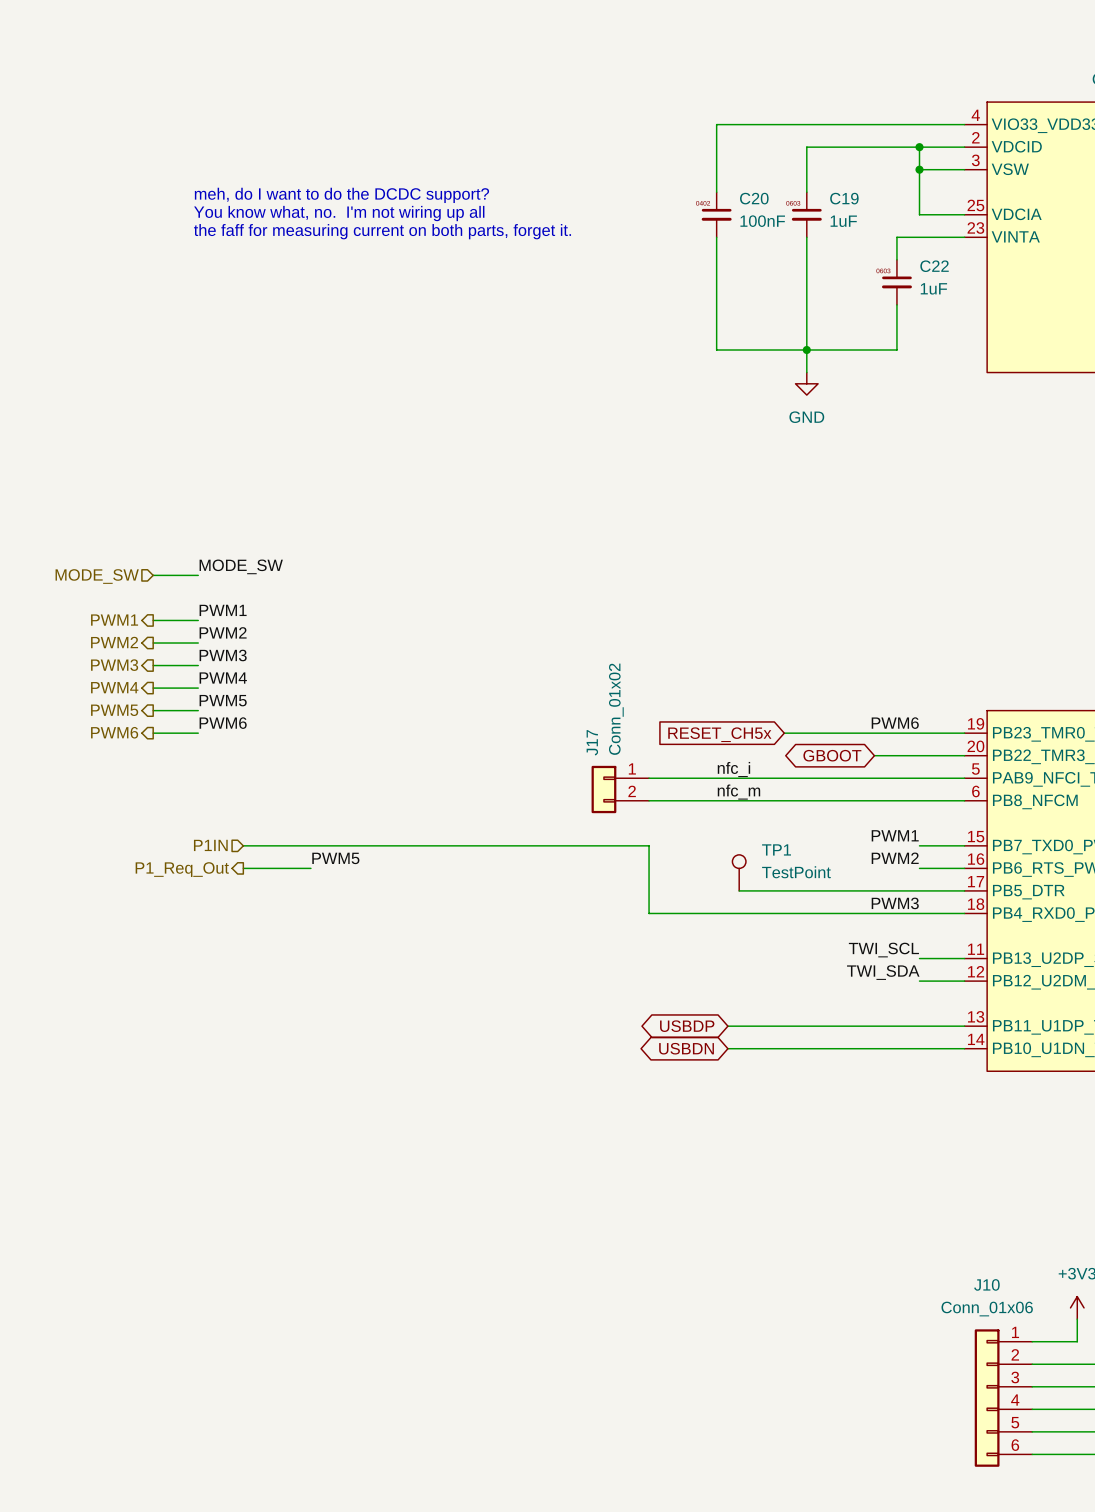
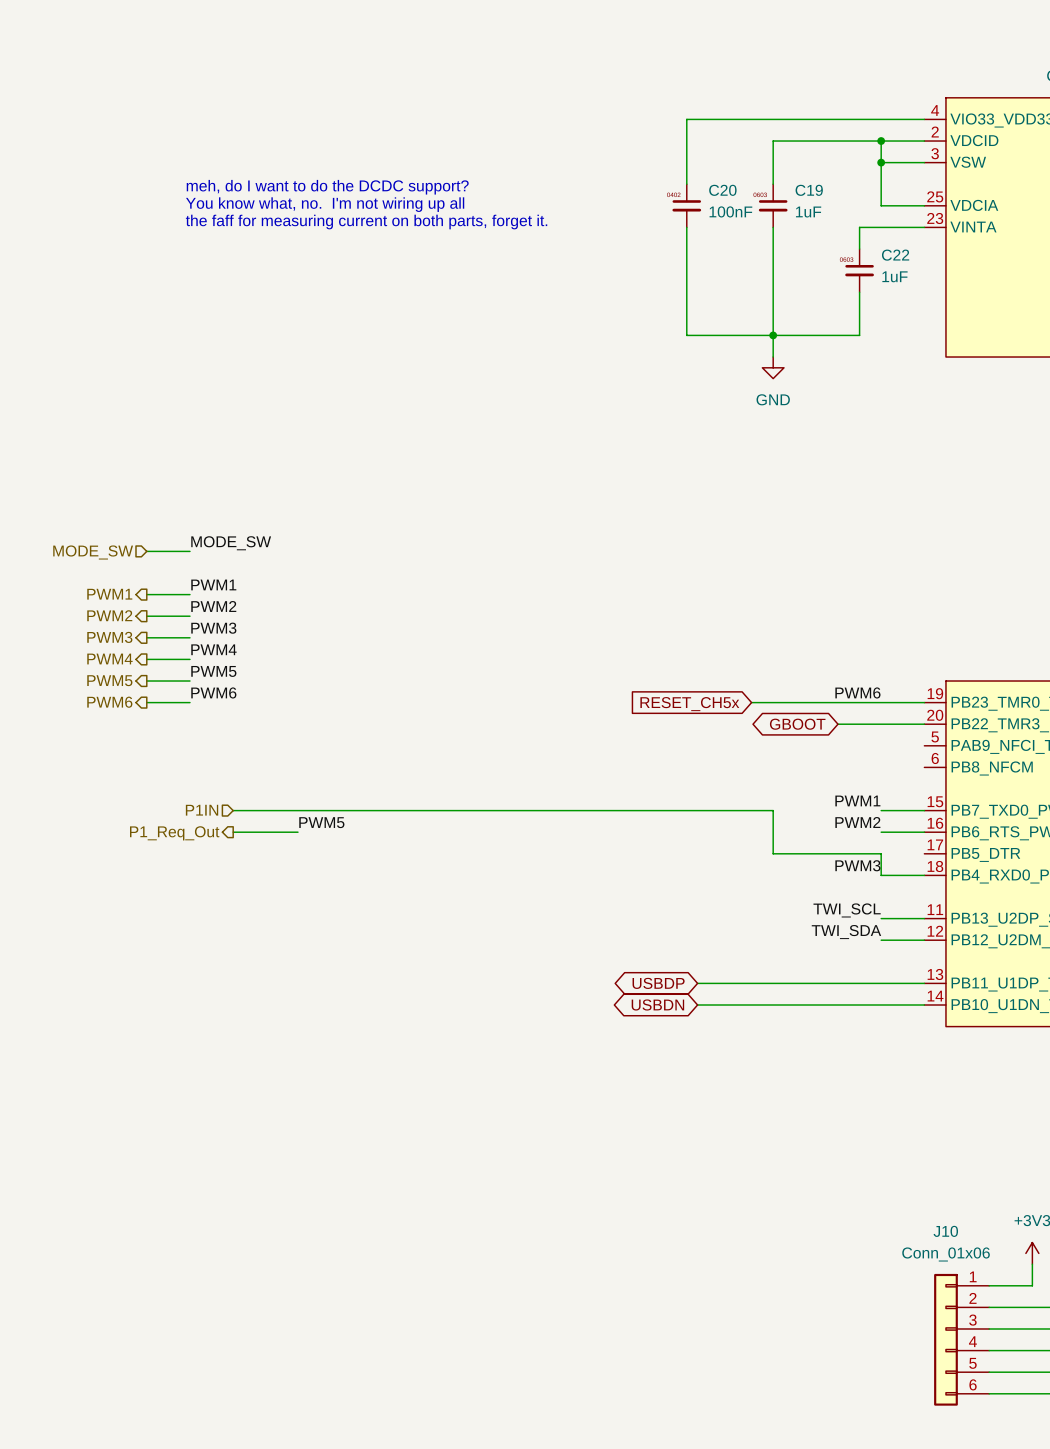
label: nfc_i (733, 769) -> none
wire: (649, 778) (964, 778) -> none
J17: Conn_01x02 (620, 789) -> none
label: nfc_m (738, 792) -> none
wire: (649, 800) (964, 800) -> none
wire: (649, 845) (649, 913) (919, 913) -> none
TP1: TestPoint (739, 872) -> none
wire: (739, 890) (806, 890) -> (621, 810) (773, 810) (773, 853)
wire: (919, 890) (964, 890) -> (881, 853) (881, 875)

